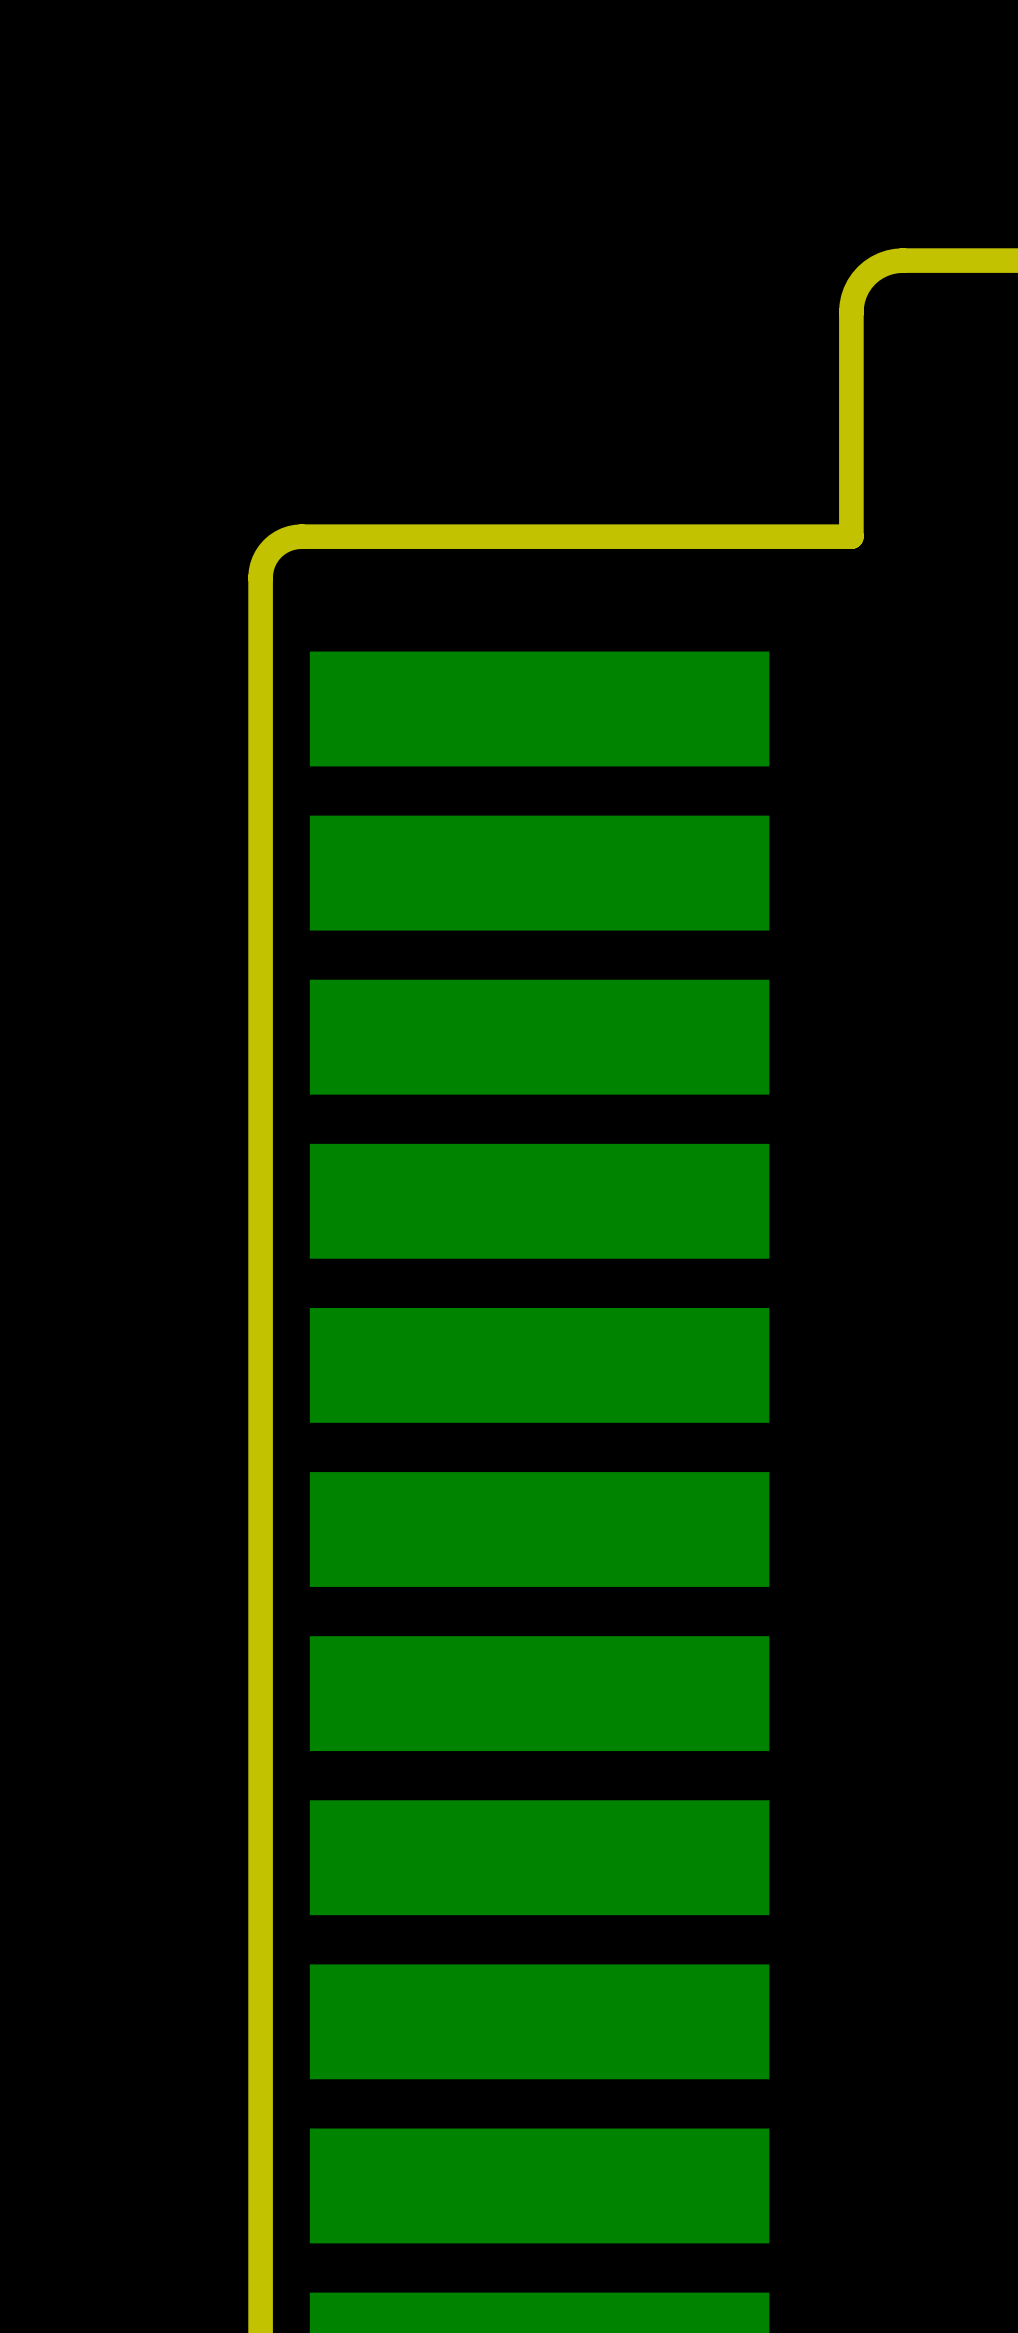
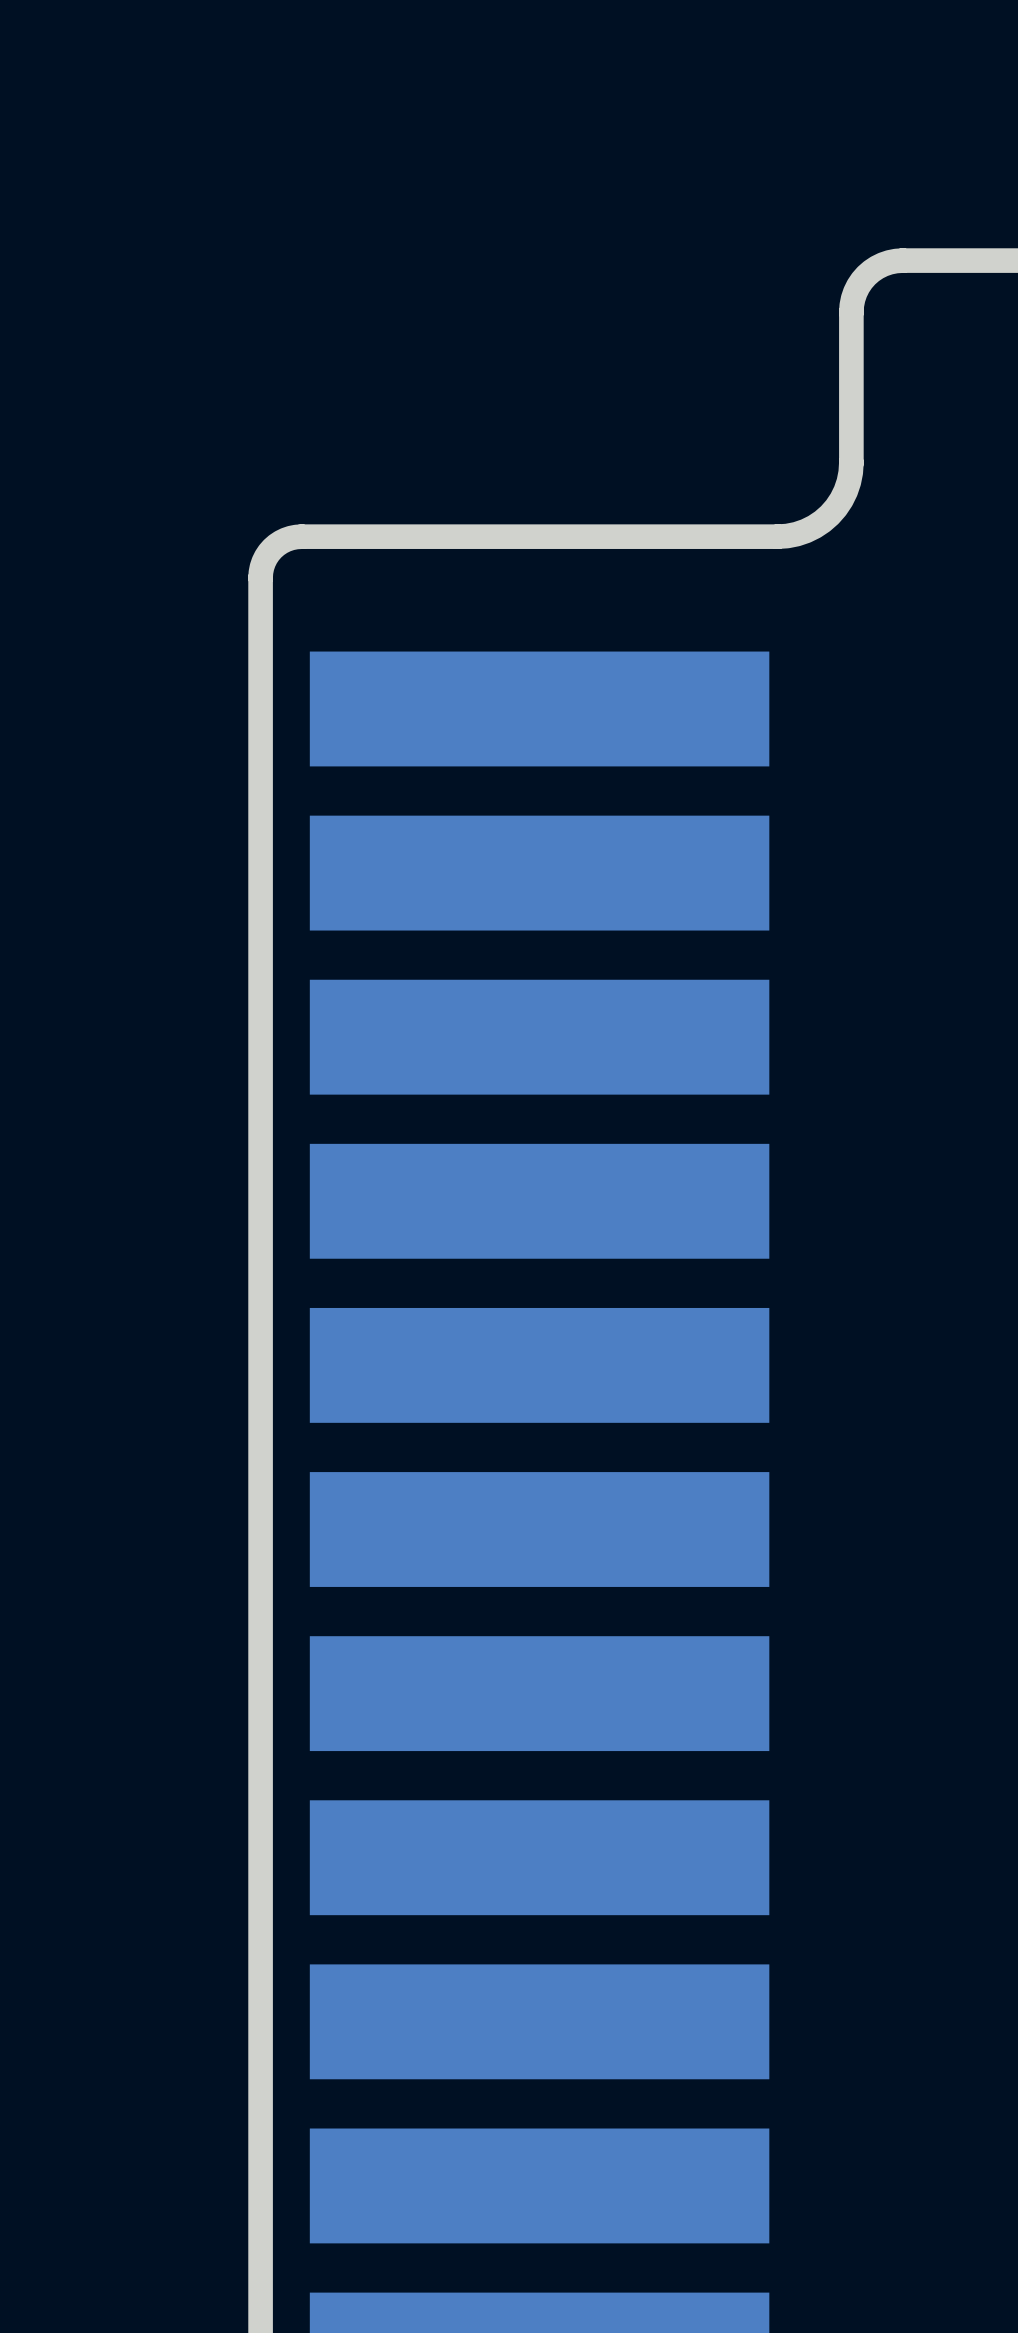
board edge: (851, 462) (851, 536) (777, 536) -> (851, 462) (845, 491) (829, 515) (805, 531) (777, 536)

